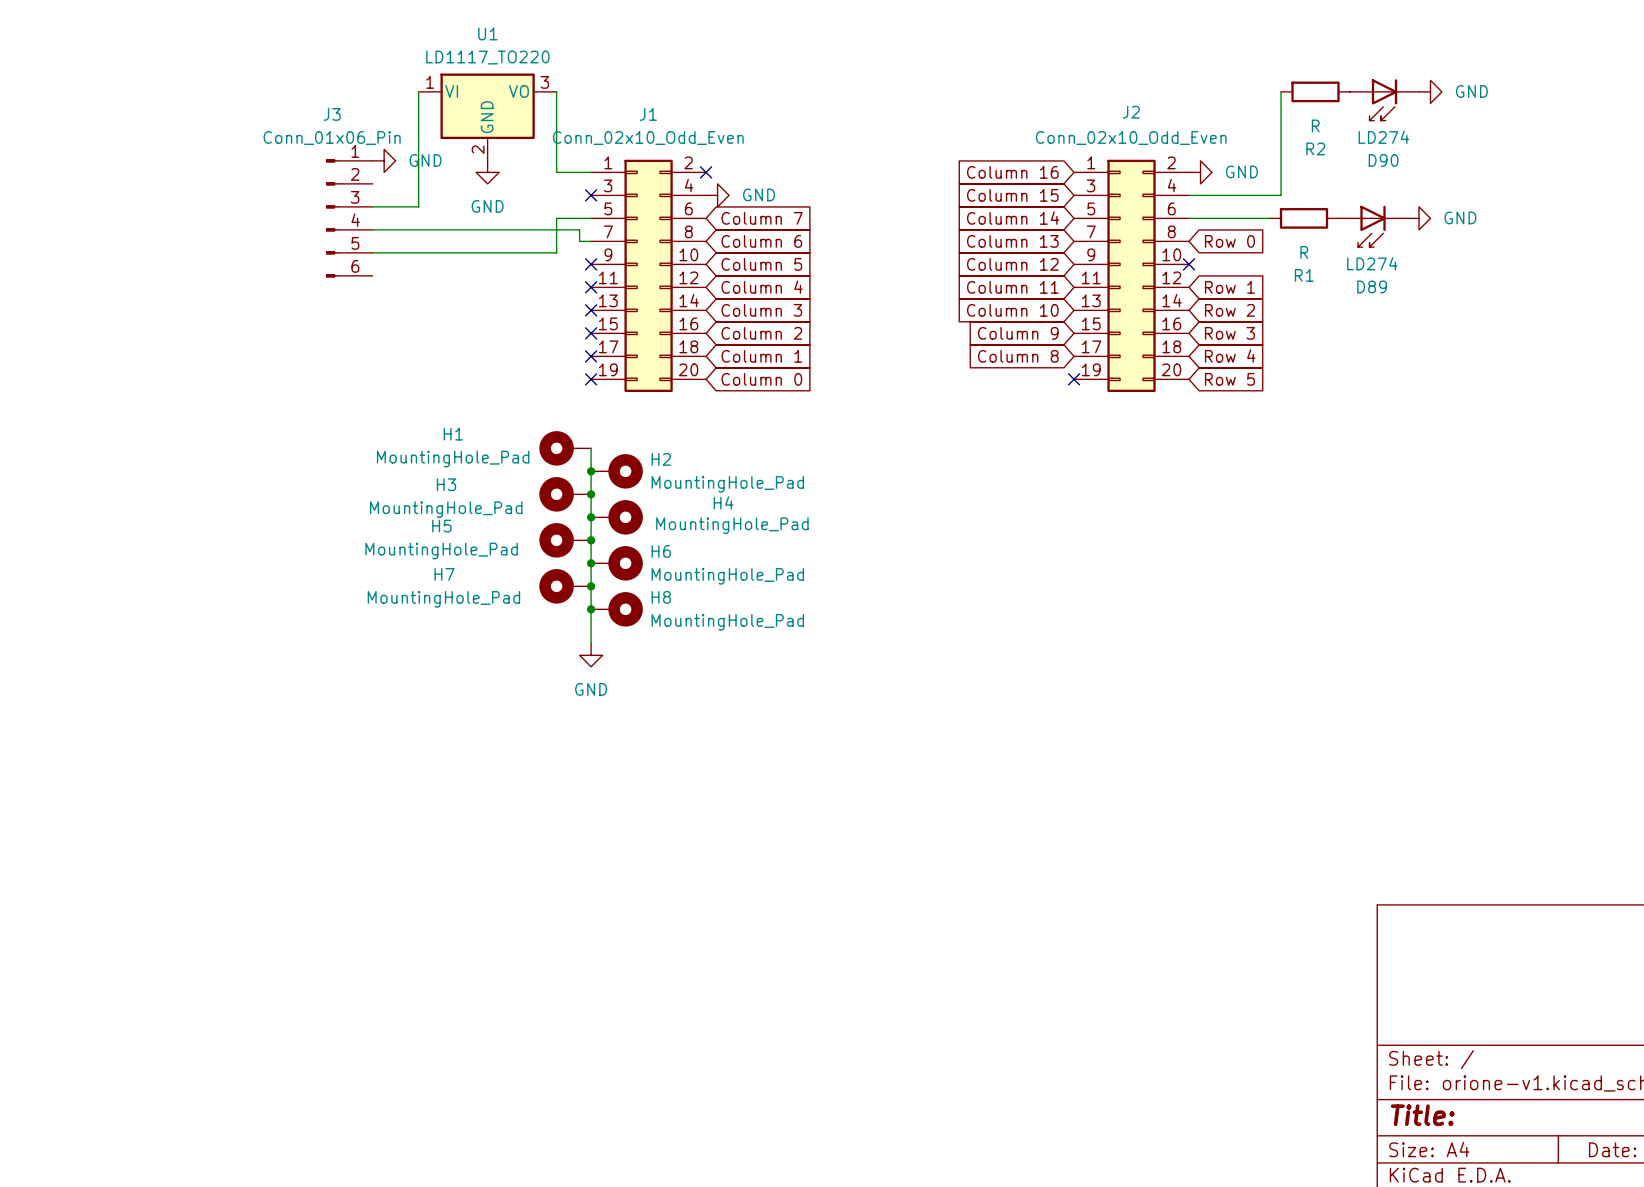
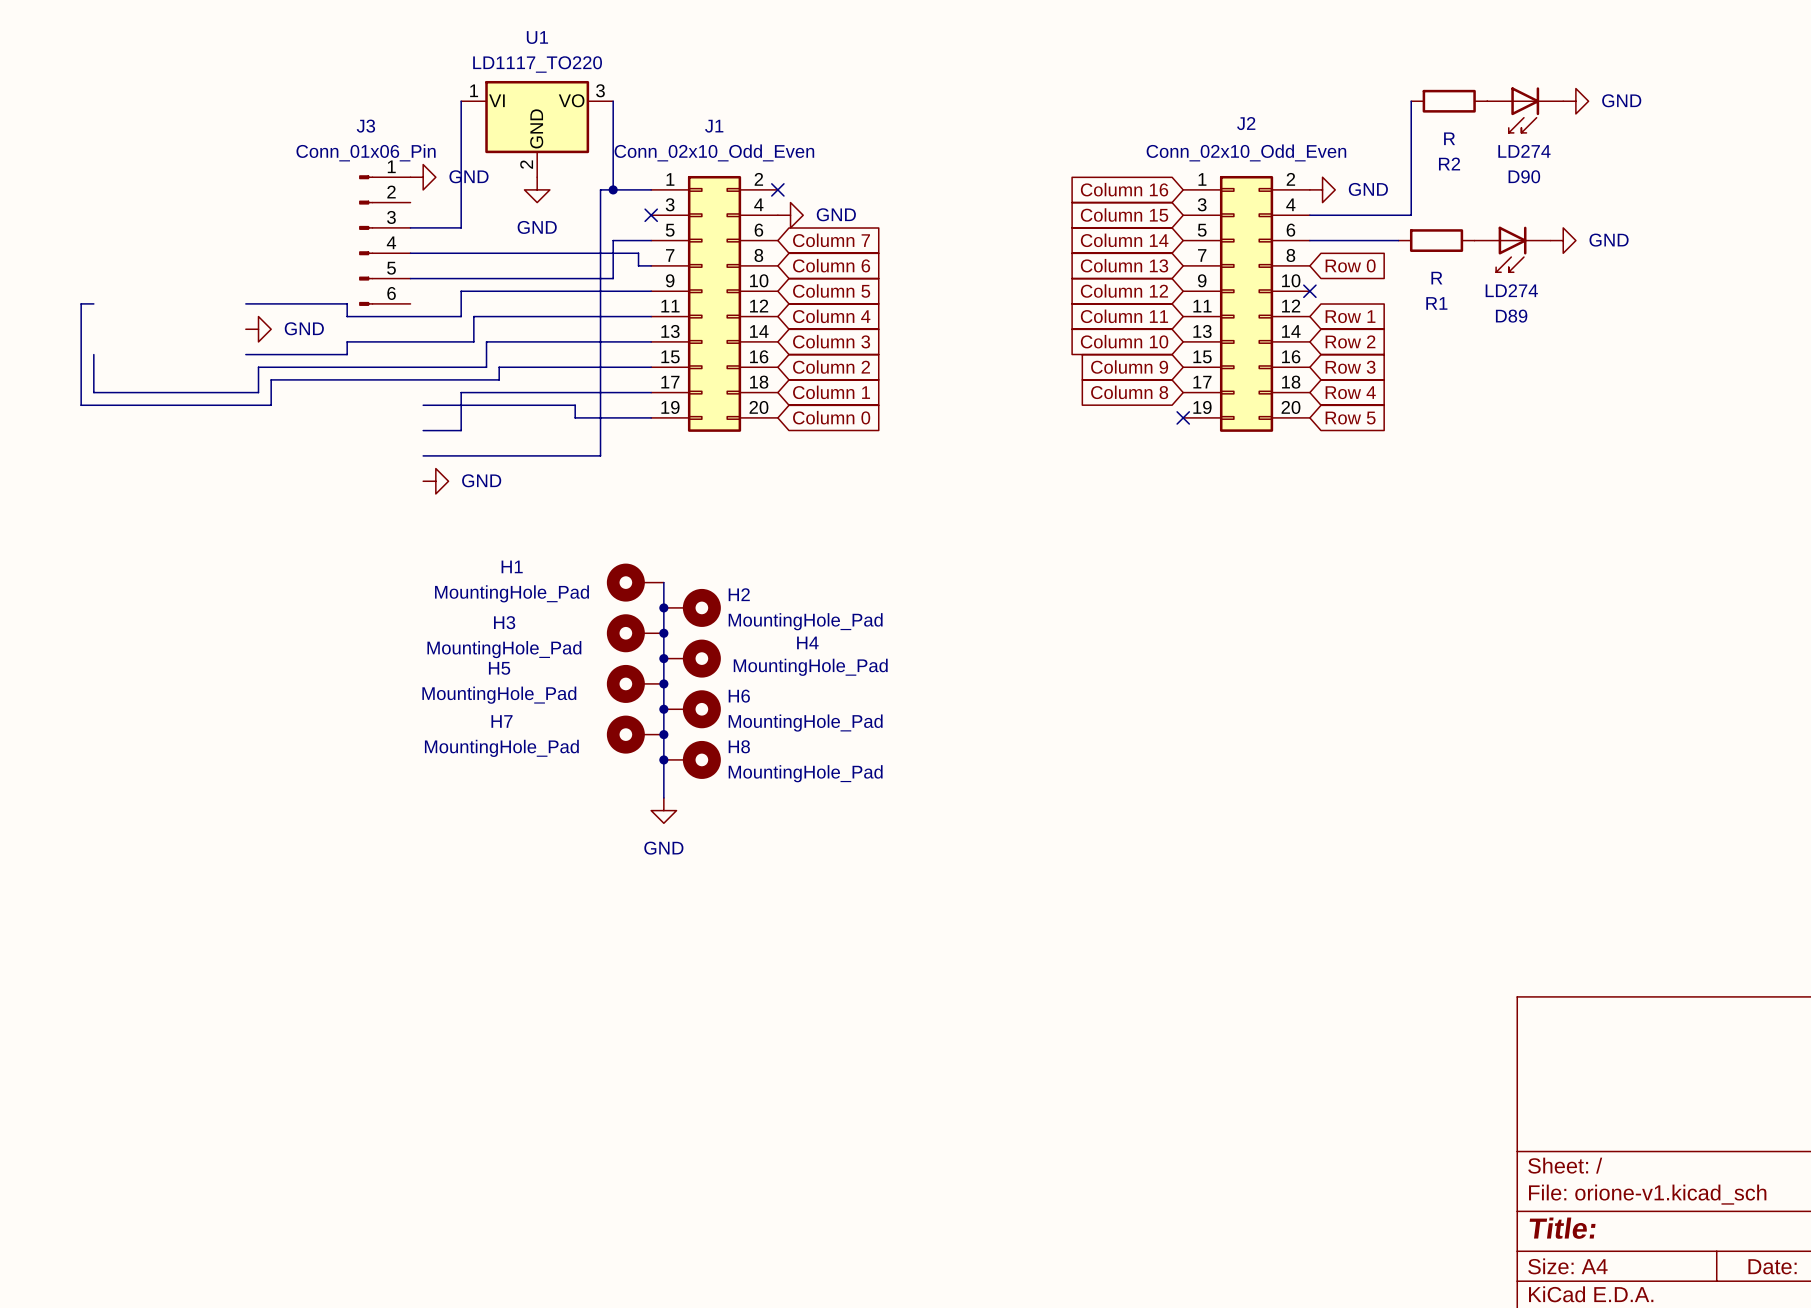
wire: none -> (613, 189) (600, 189) (600, 455) (423, 455)
junction: none -> (613, 189)
wire: none -> (651, 291) (461, 291) (461, 316) (347, 316) (347, 303) (245, 303)
no-connect mark: (591, 264) -> none
wire: none -> (93, 303) (81, 303) (81, 405) (271, 405) (271, 379) (499, 379) (499, 367) (651, 367)
wire: none -> (651, 316) (473, 316) (473, 341) (347, 341) (347, 354) (245, 354)
no-connect mark: (591, 287) -> none
power symbol: none -> GND (258, 329)
wire: none -> (651, 341) (486, 341) (486, 367) (258, 367) (258, 392) (93, 392) (93, 354)
no-connect mark: (591, 310) -> none
no-connect mark: (591, 333) -> none
wire: none -> (651, 392) (461, 392) (461, 430) (423, 430)
no-connect mark: (591, 356) -> none
wire: none -> (423, 405) (575, 405) (575, 417) (651, 417)
no-connect mark: (591, 379) -> none
power symbol: none -> GND (435, 481)
H1 position: (565, 448) -> (635, 582)
wire: (591, 448) (591, 643) -> (663, 582) (663, 797)
junction: (591, 471) -> none
H2 position: (616, 471) -> (692, 607)
H3 position: (565, 494) -> (635, 633)
junction: (591, 494) -> none
junction: (591, 517) -> none
H4 position: (616, 517) -> (692, 658)
H5 position: (565, 540) -> (635, 683)
junction: (591, 540) -> none
junction: none -> (663, 607)
junction: (591, 563) -> none
H6 position: (616, 563) -> (692, 709)
junction: none -> (663, 633)
H7 position: (565, 586) -> (635, 734)
junction: (591, 586) -> none
junction: none -> (663, 658)
junction: (591, 609) -> none
H8 position: (616, 609) -> (692, 759)
junction: none -> (663, 683)
junction: none -> (663, 709)
power symbol position: GND (591, 655) -> GND (663, 810)
junction: none -> (663, 734)
junction: none -> (663, 759)

